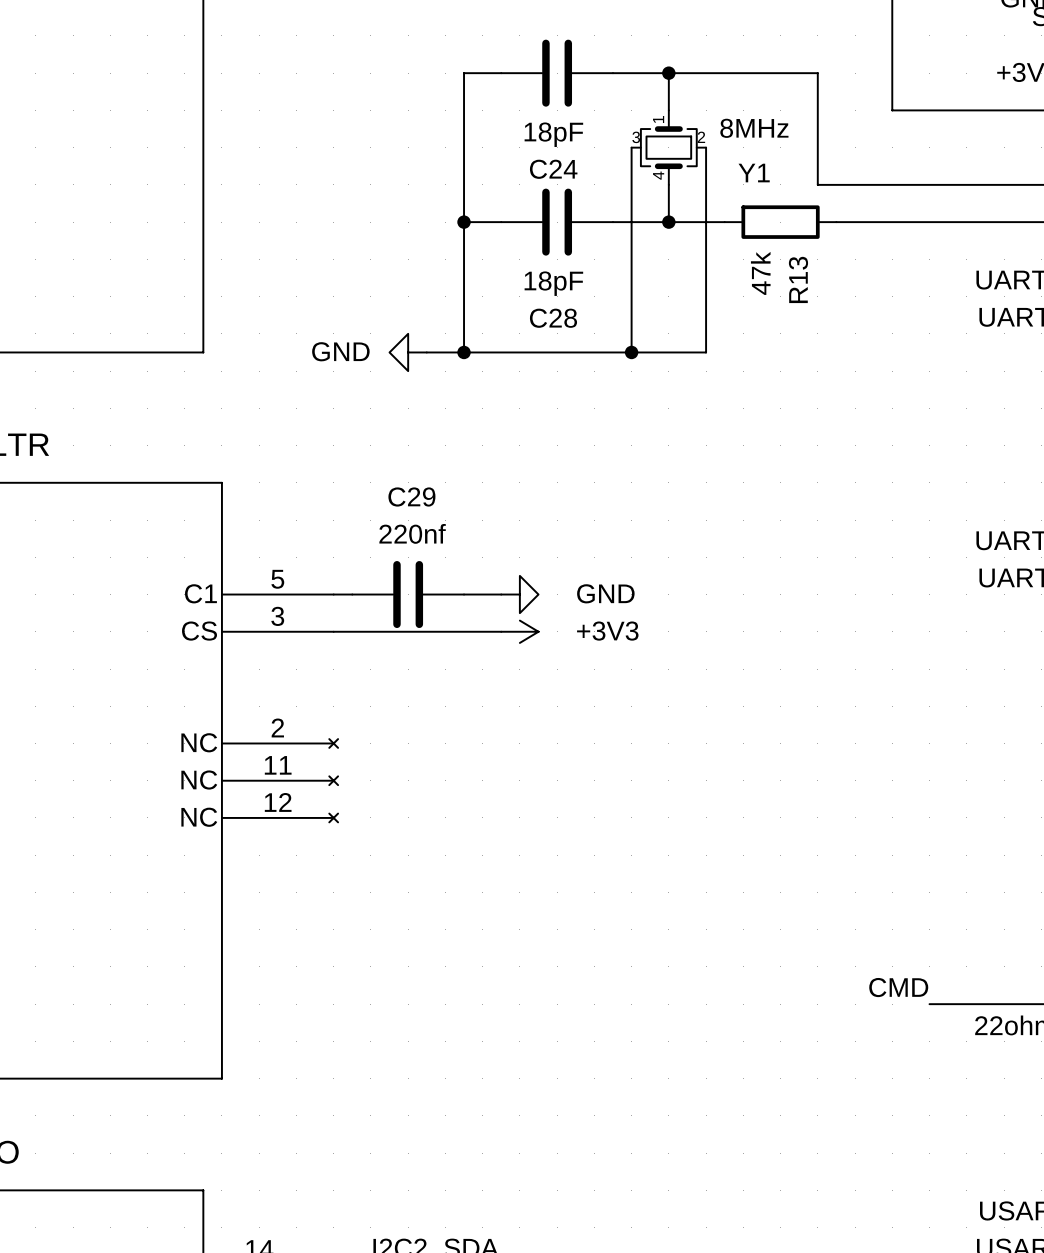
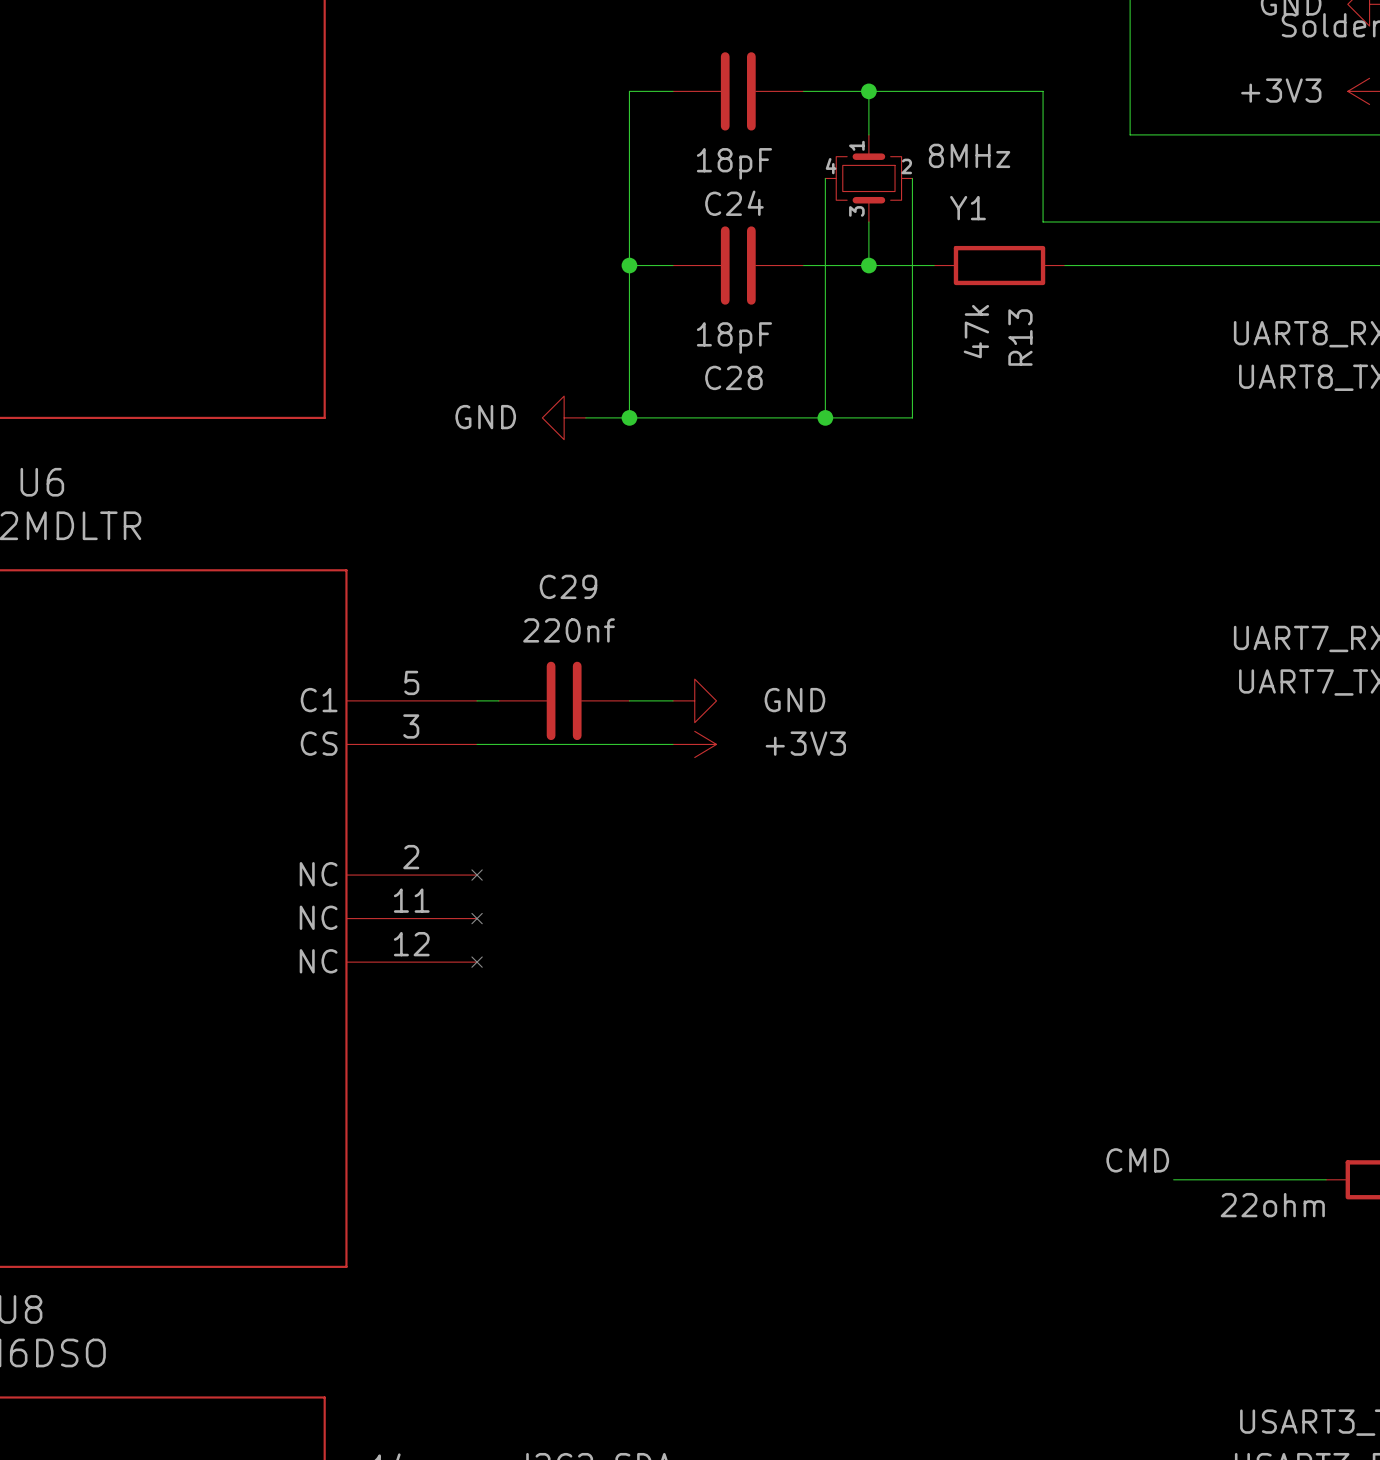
Y1 pin number: 3 (636, 137) -> 4 (831, 166)
Y1 pin number: 4 (658, 175) -> 3 (856, 211)

